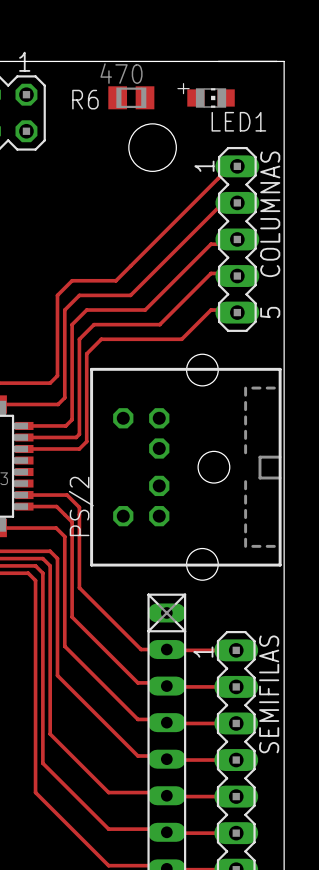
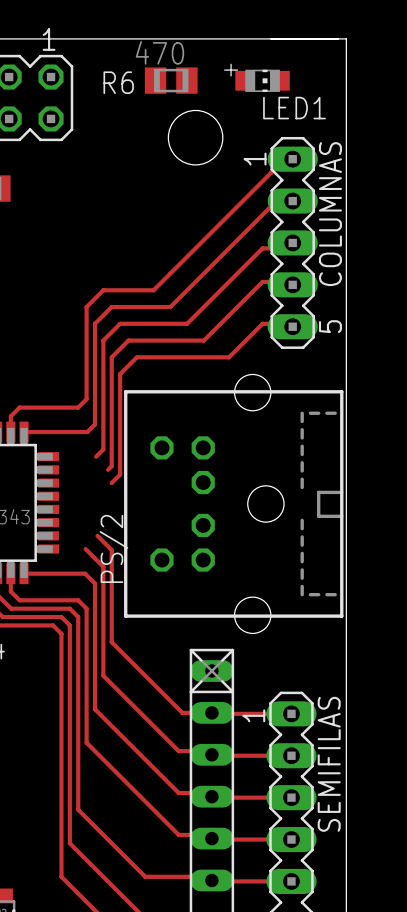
track: (24, 425) (65, 425) -> none
track: (24, 437) (76, 437) -> none
track: (24, 448) (79, 448) -> none
track: (24, 495) (67, 495) -> none
track: (24, 506) (56, 506) -> none

